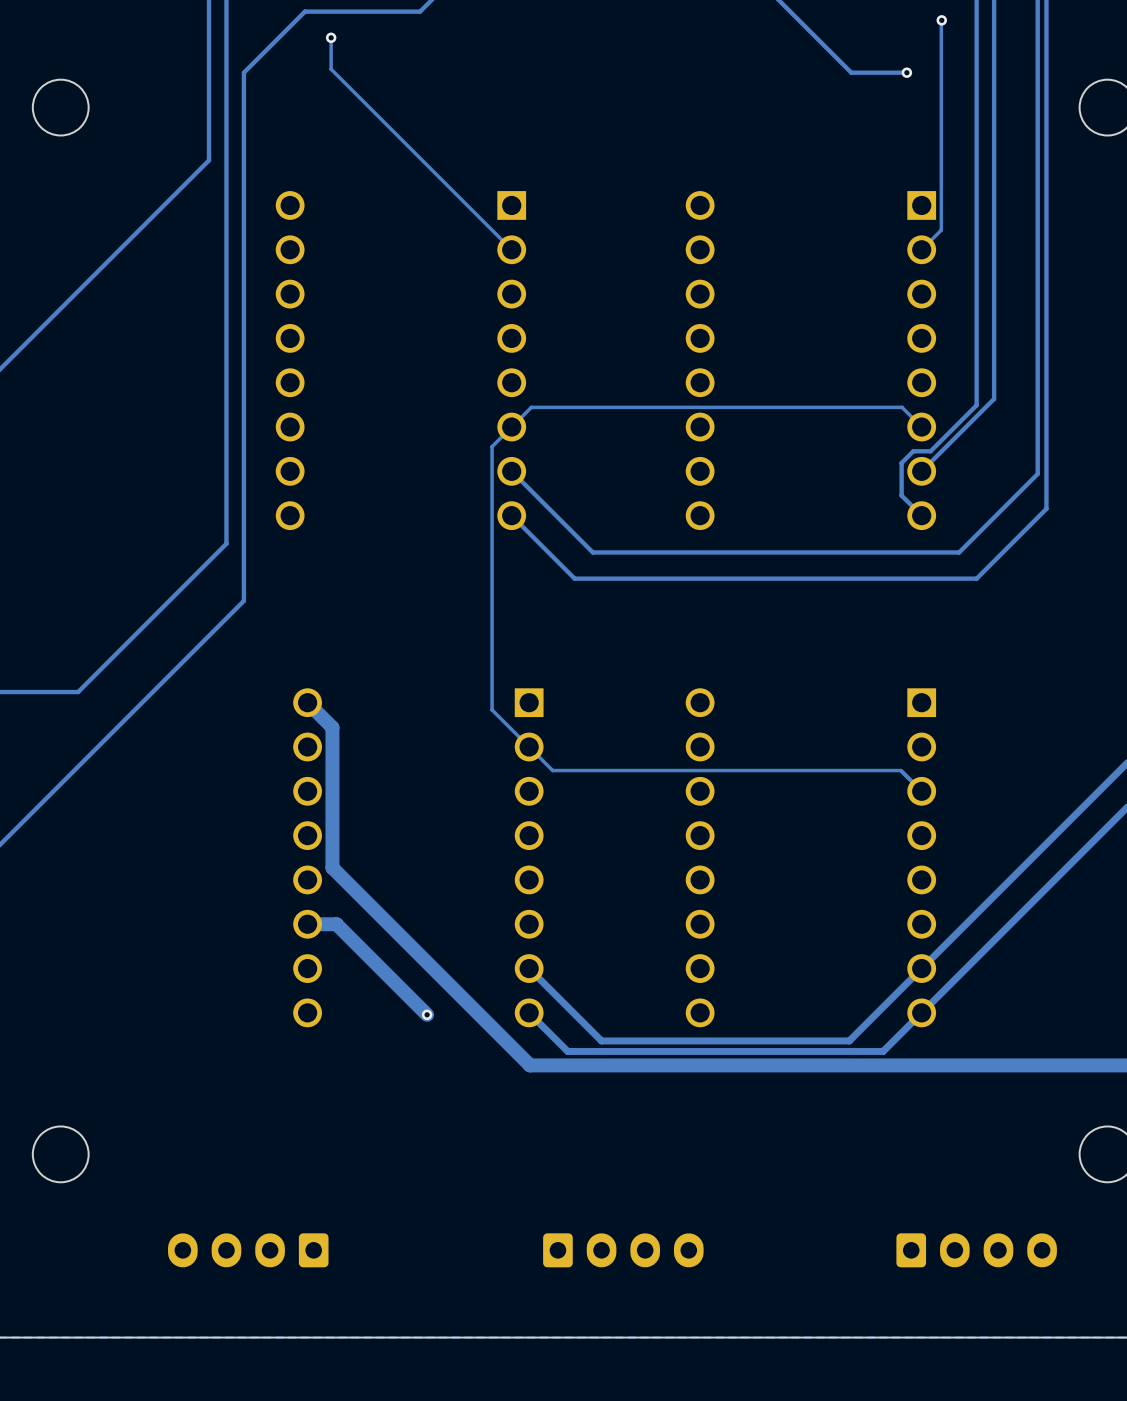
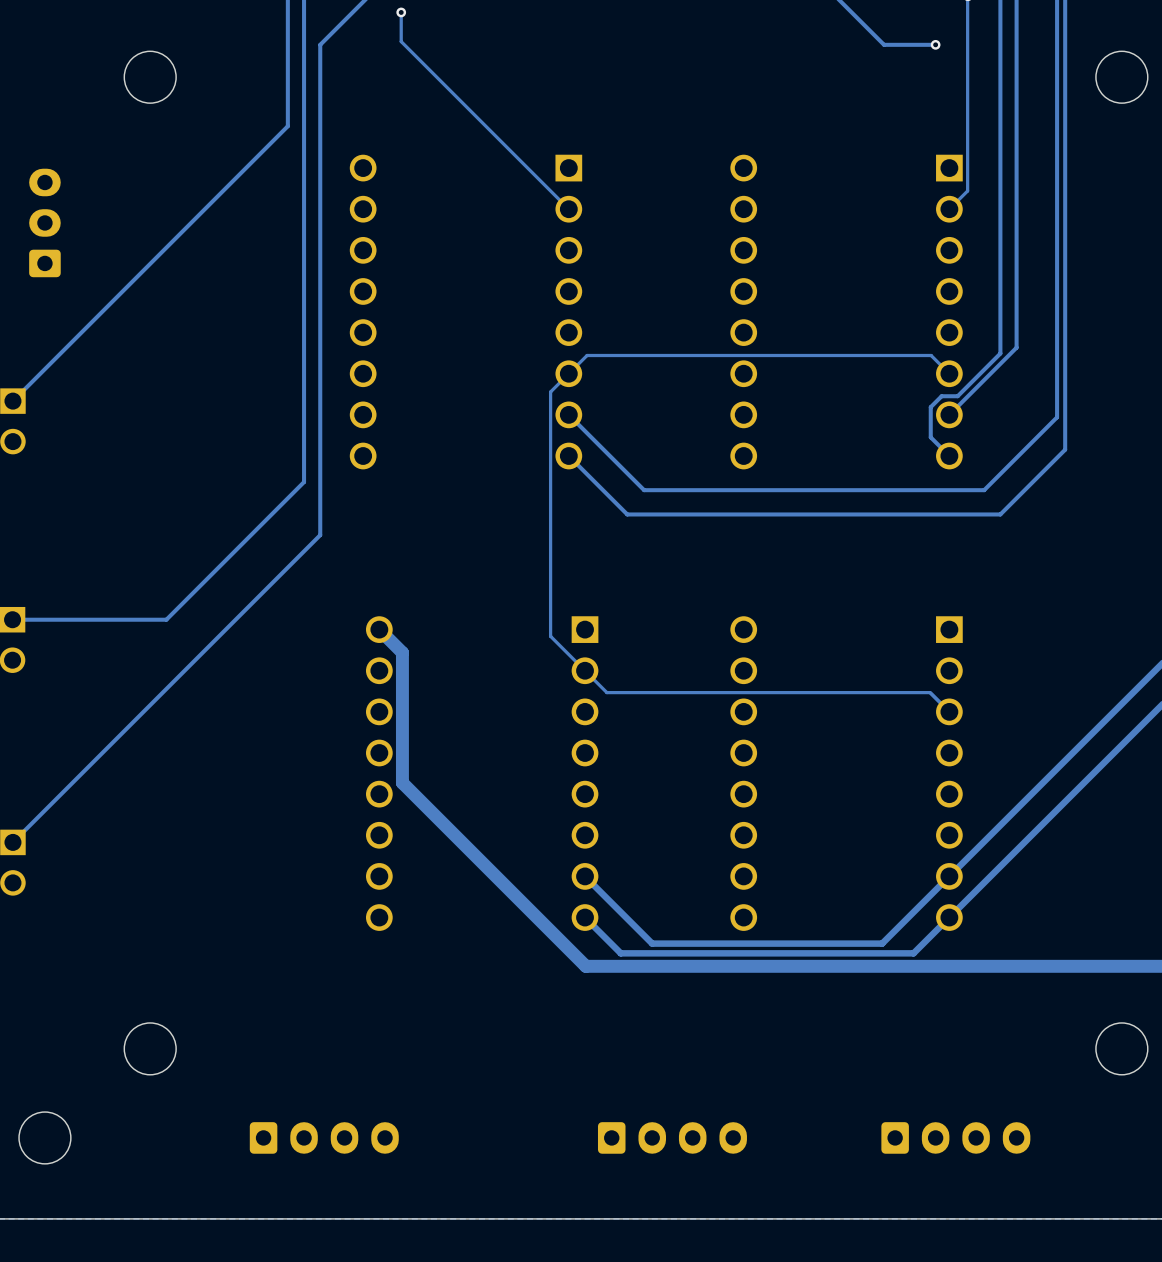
track: (307, 924) (336, 924) (427, 1014) -> none
via: (427, 1014) -> none
part rotation: 0° (248, 1250) -> 180° (324, 1137)
part position: (976, 1250) -> (955, 1137)

